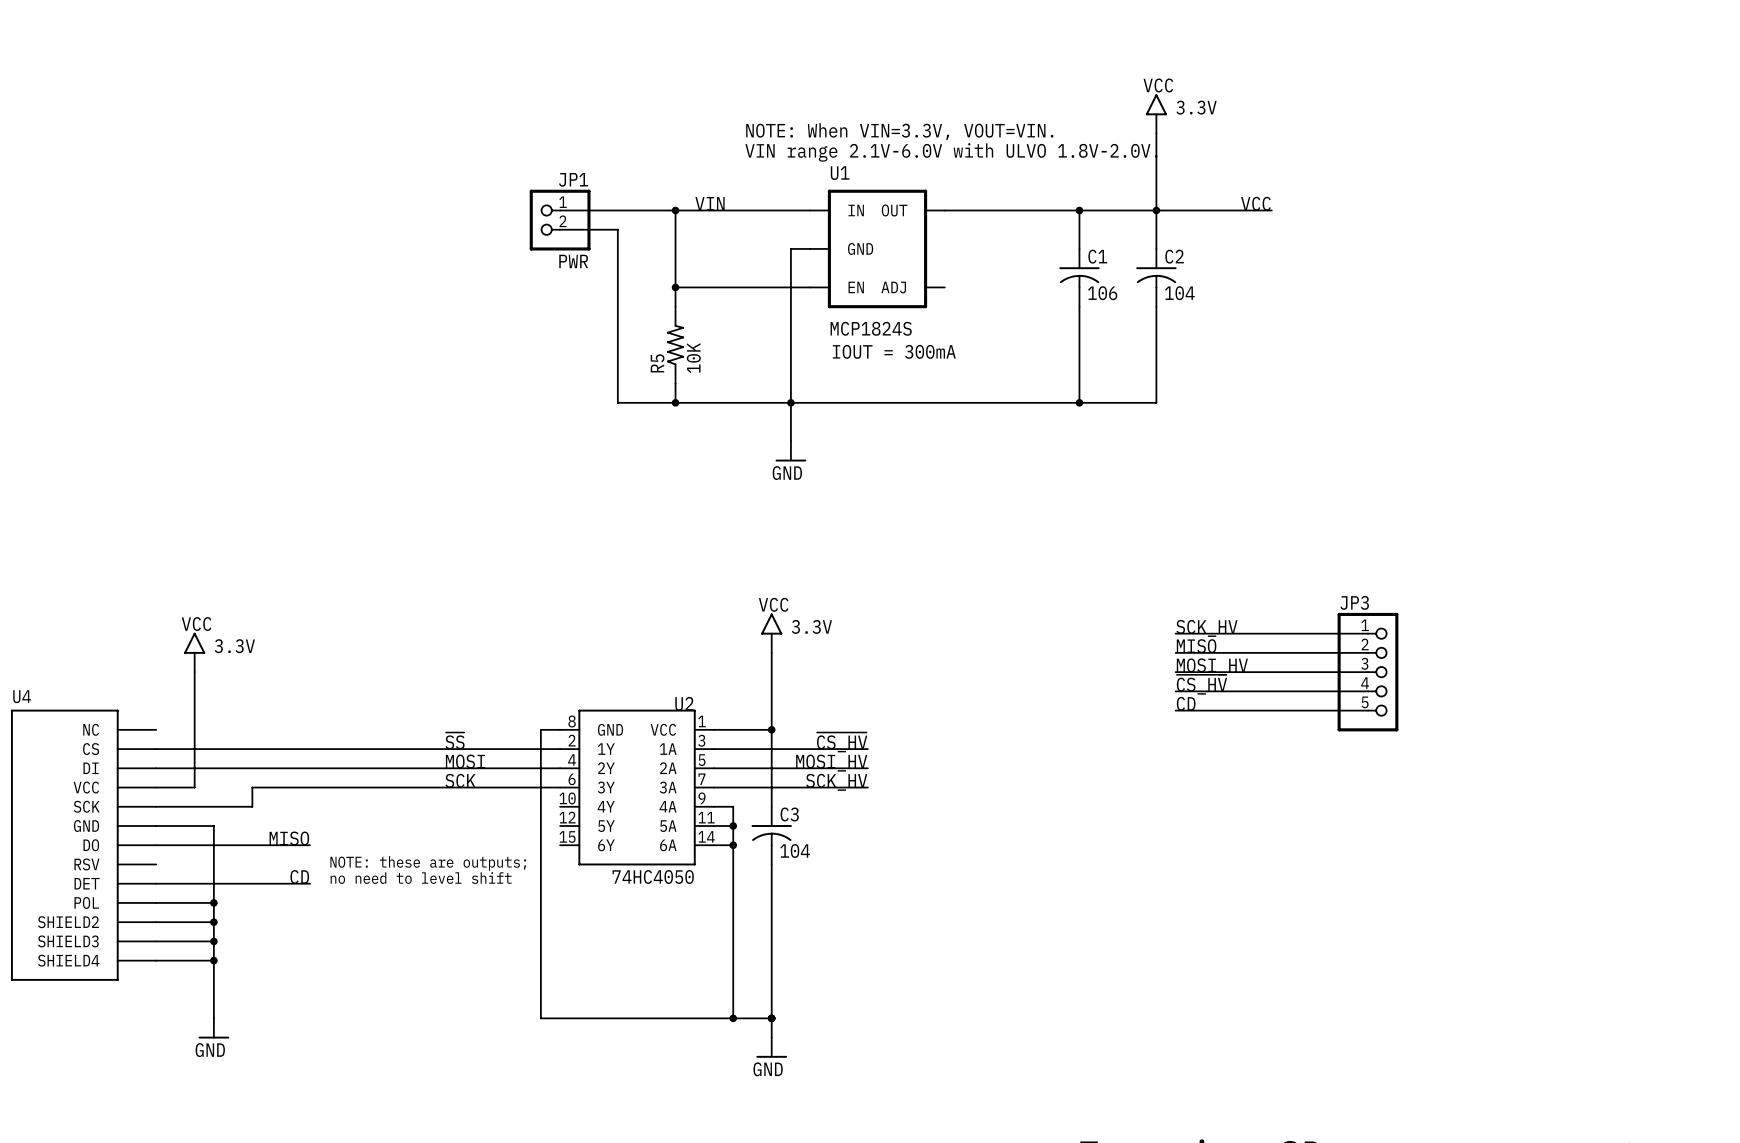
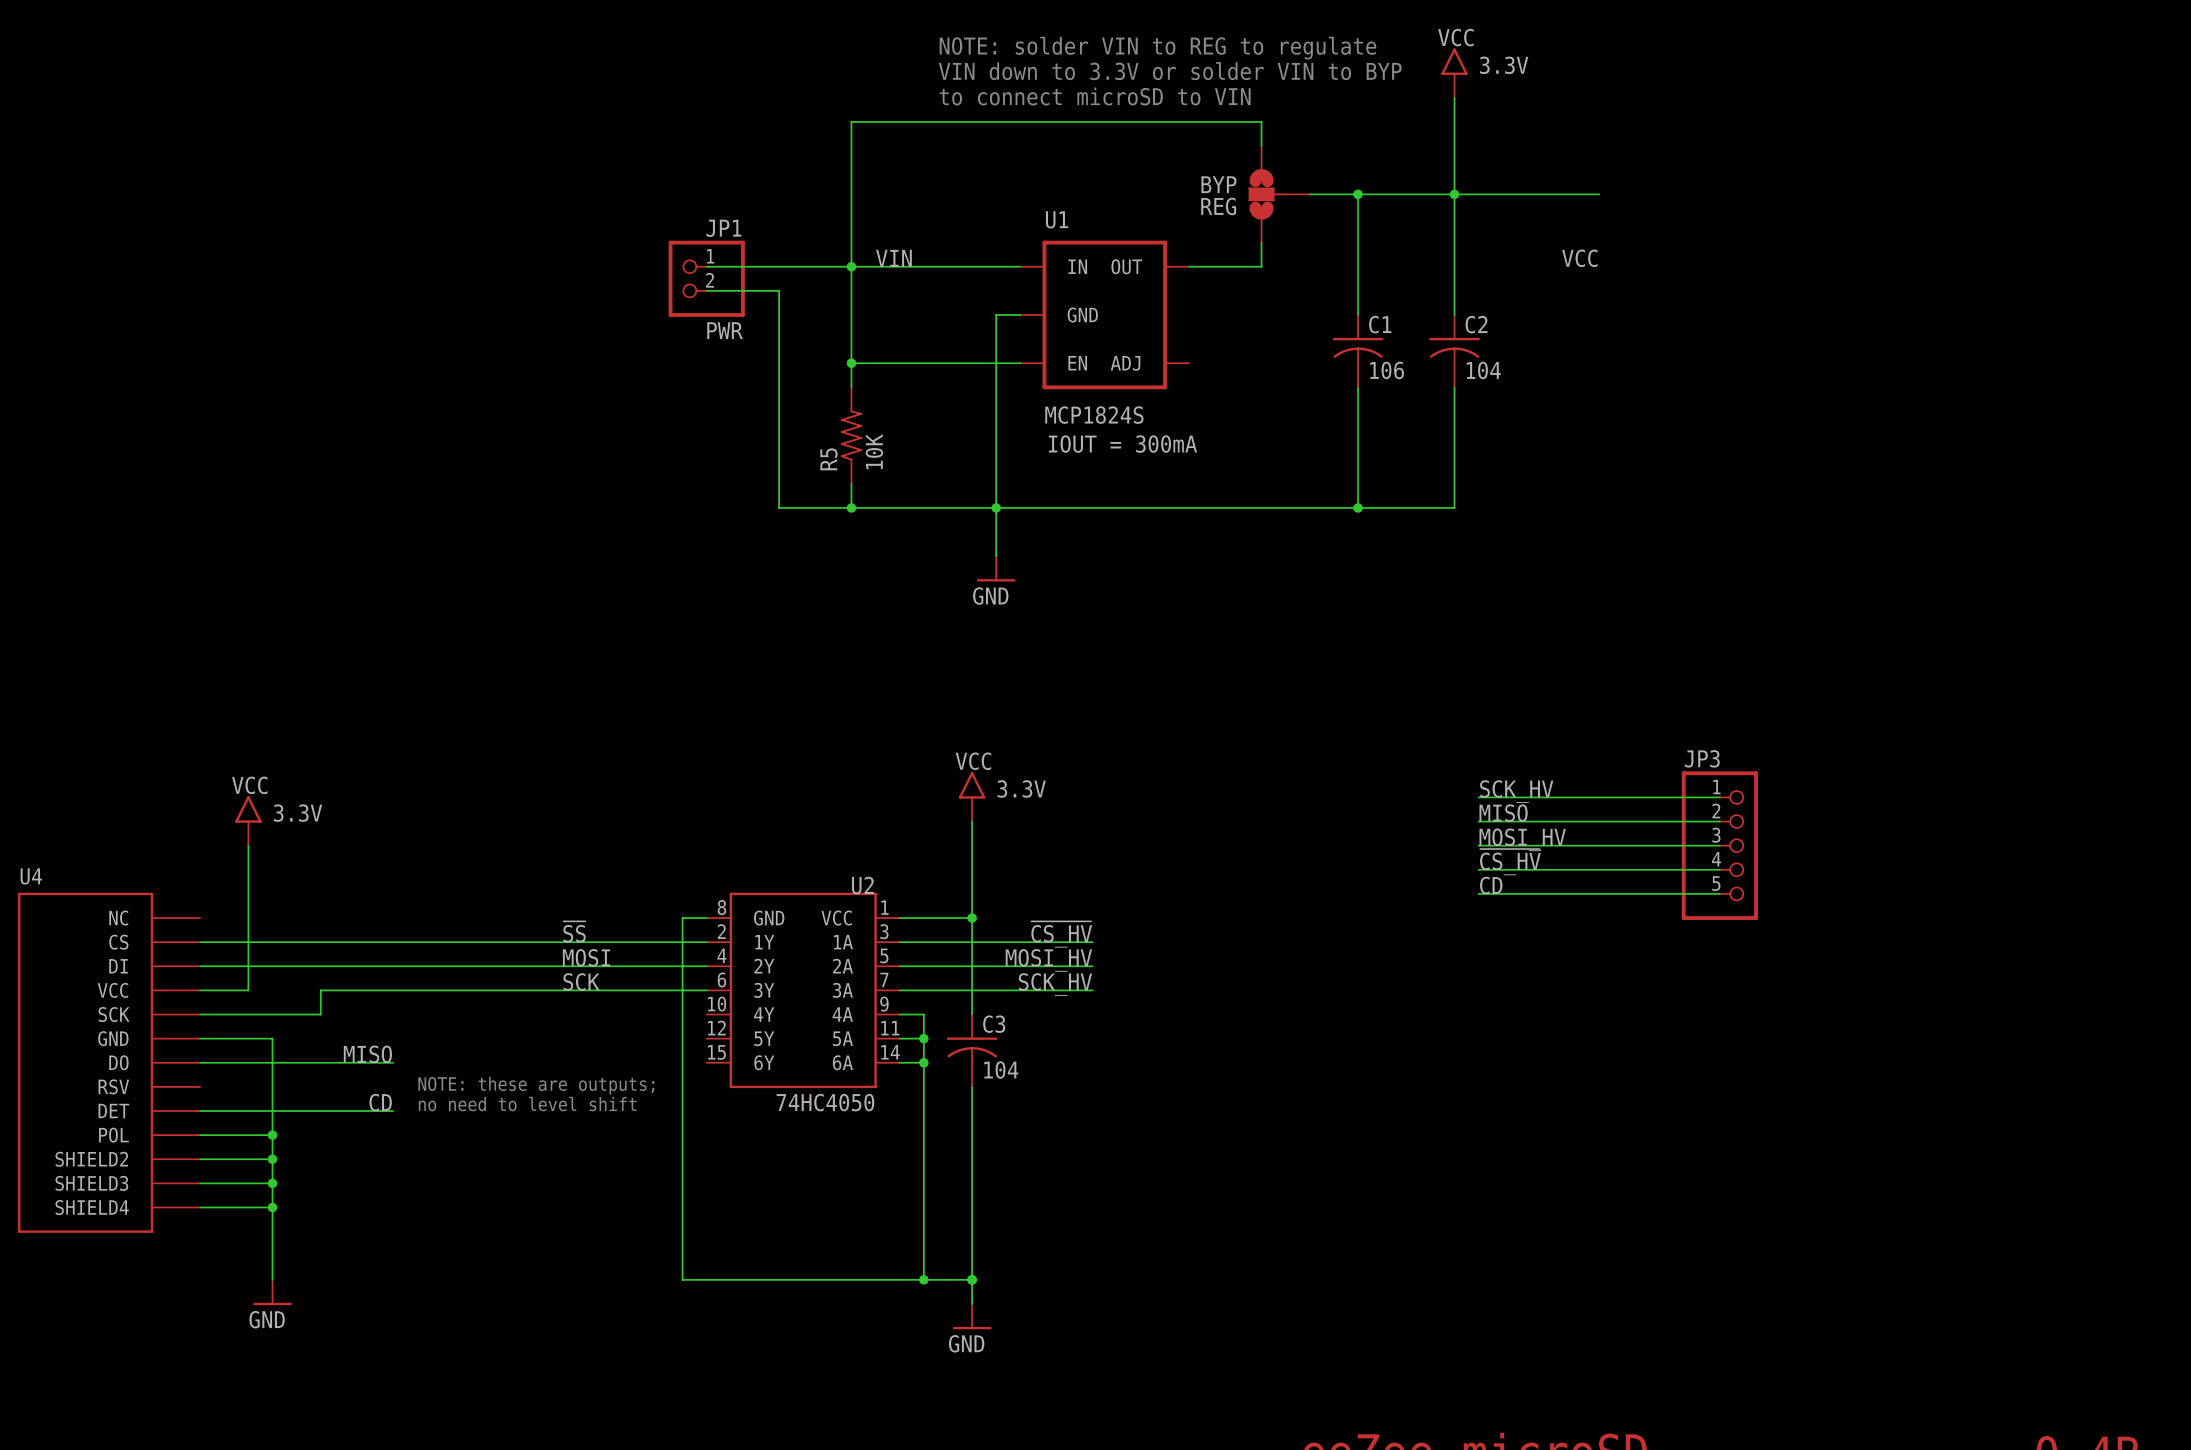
text: none -> NOTE: solder VIN to REG to regulate (1158, 48)
text: none -> VIN down to 3.3V or solder VIN to BYP (1170, 71)
text: none -> to connect microSD to VIN (1095, 96)
wire: none -> (1454, 97) (1454, 170)
power symbol position: 3.3V (1156, 113) -> 3.3V (1454, 73)
wire: none -> (1261, 146) (1261, 122) (851, 122) (851, 266)
text: NOTE: When VIN=3.3V, VOUT=VIN. (899, 131) -> none
text: VIN range 2.1V-6.0V with ULVO 1.8V-2.0V. (951, 152) -> none
REG: none -> BYP (1279, 194)
wire: none -> (1309, 194) (1599, 194)
wire: none -> (1358, 194) (1358, 266)
junction: none -> (1358, 194)
junction: none -> (1454, 194)
wire: (1002, 210) (1271, 210) -> (1261, 266) (1261, 242)
junction: (1079, 210) -> none
junction: (1156, 210) -> none

